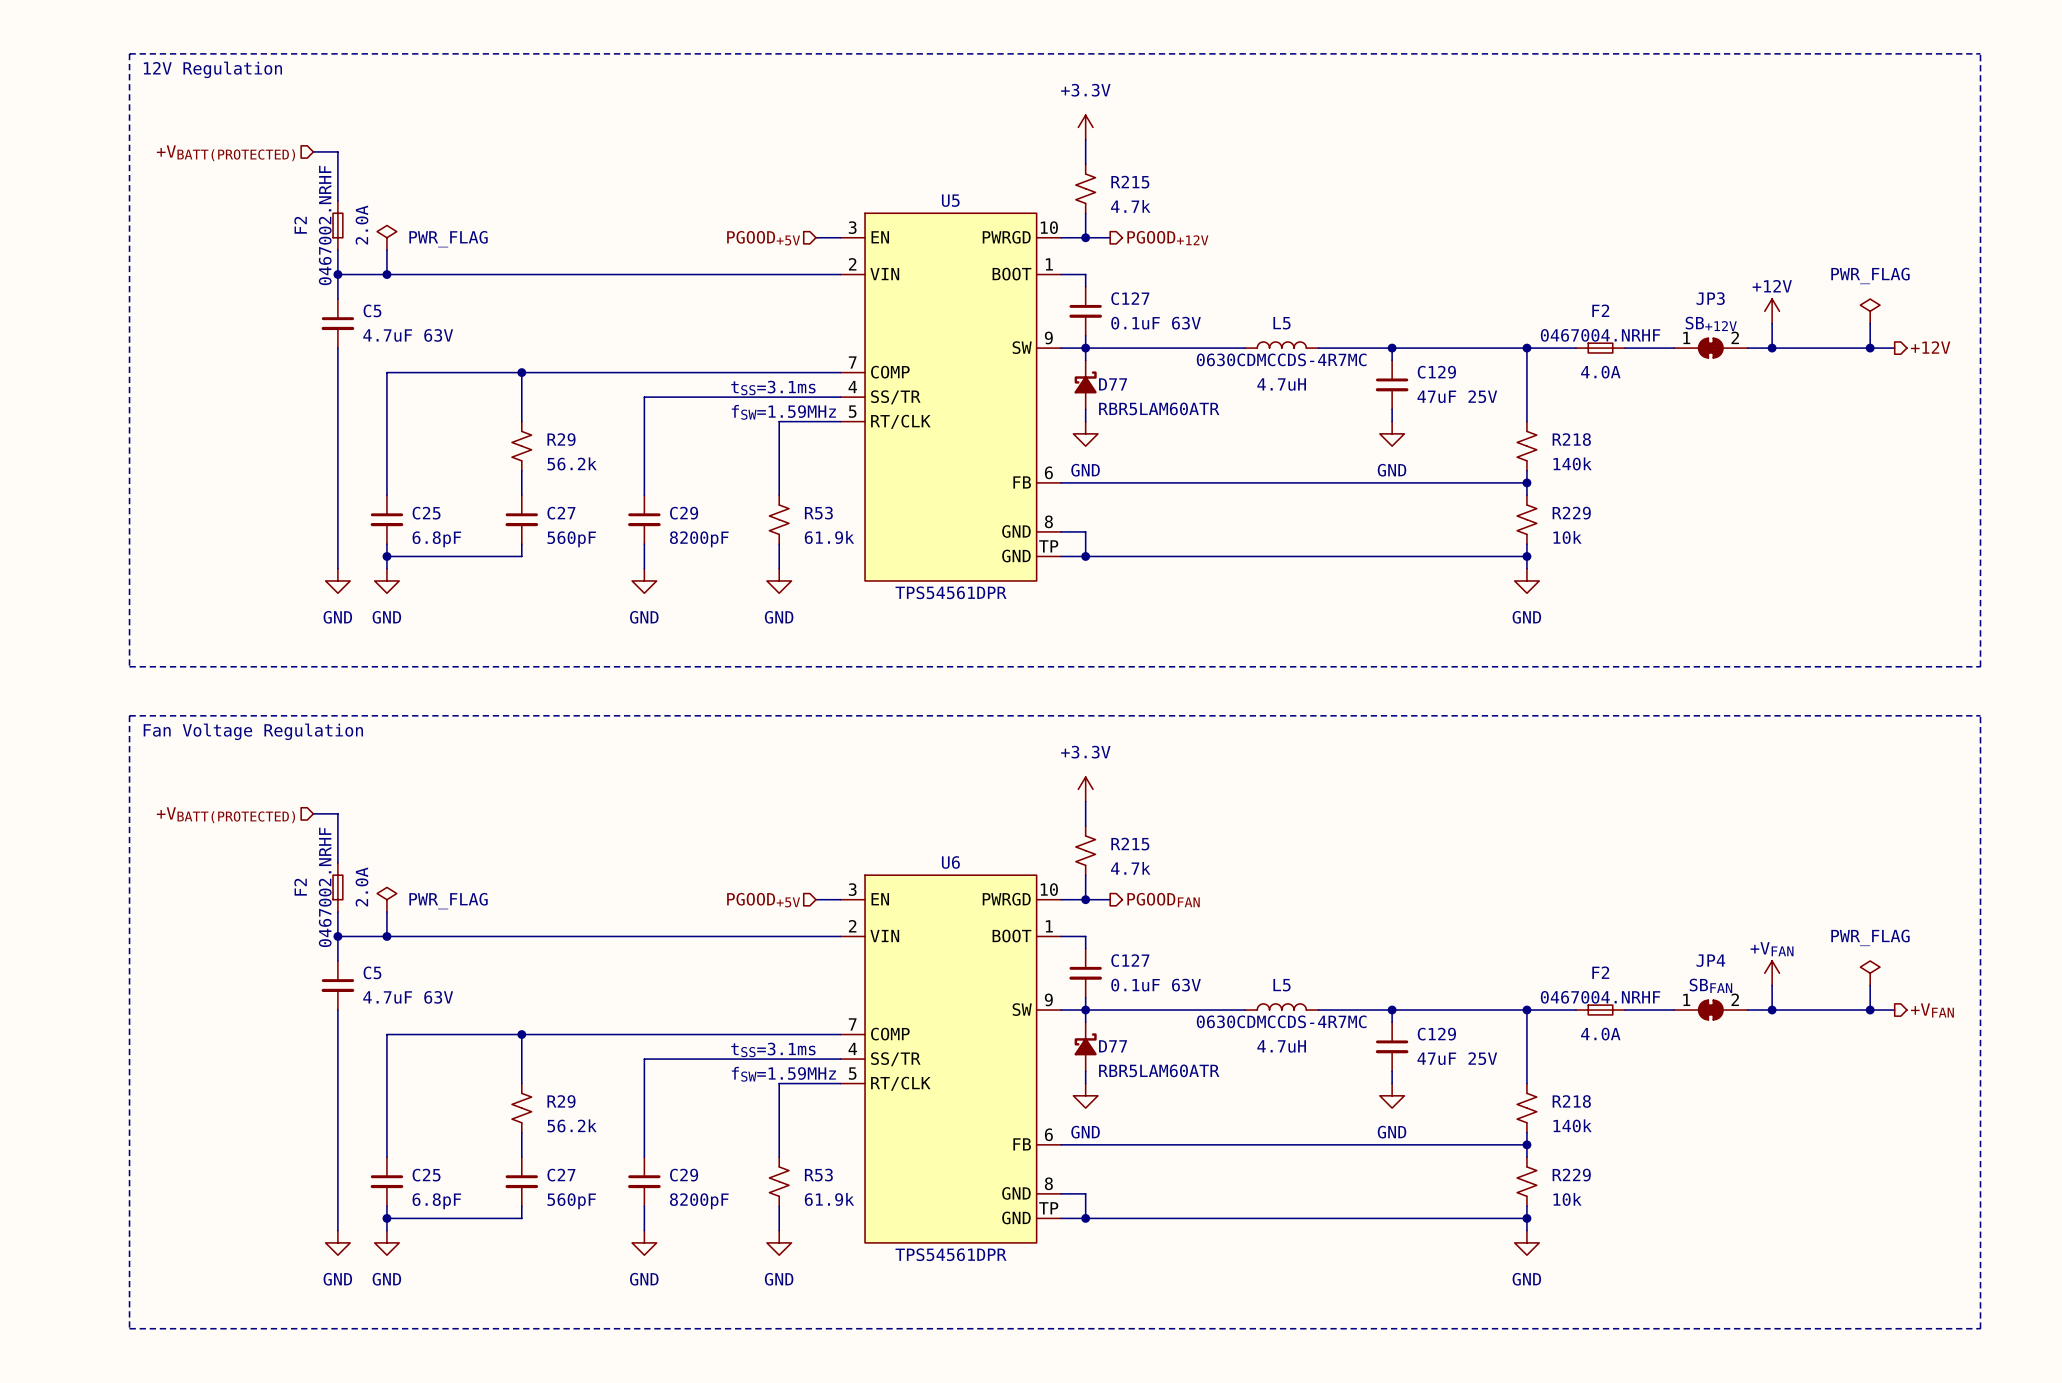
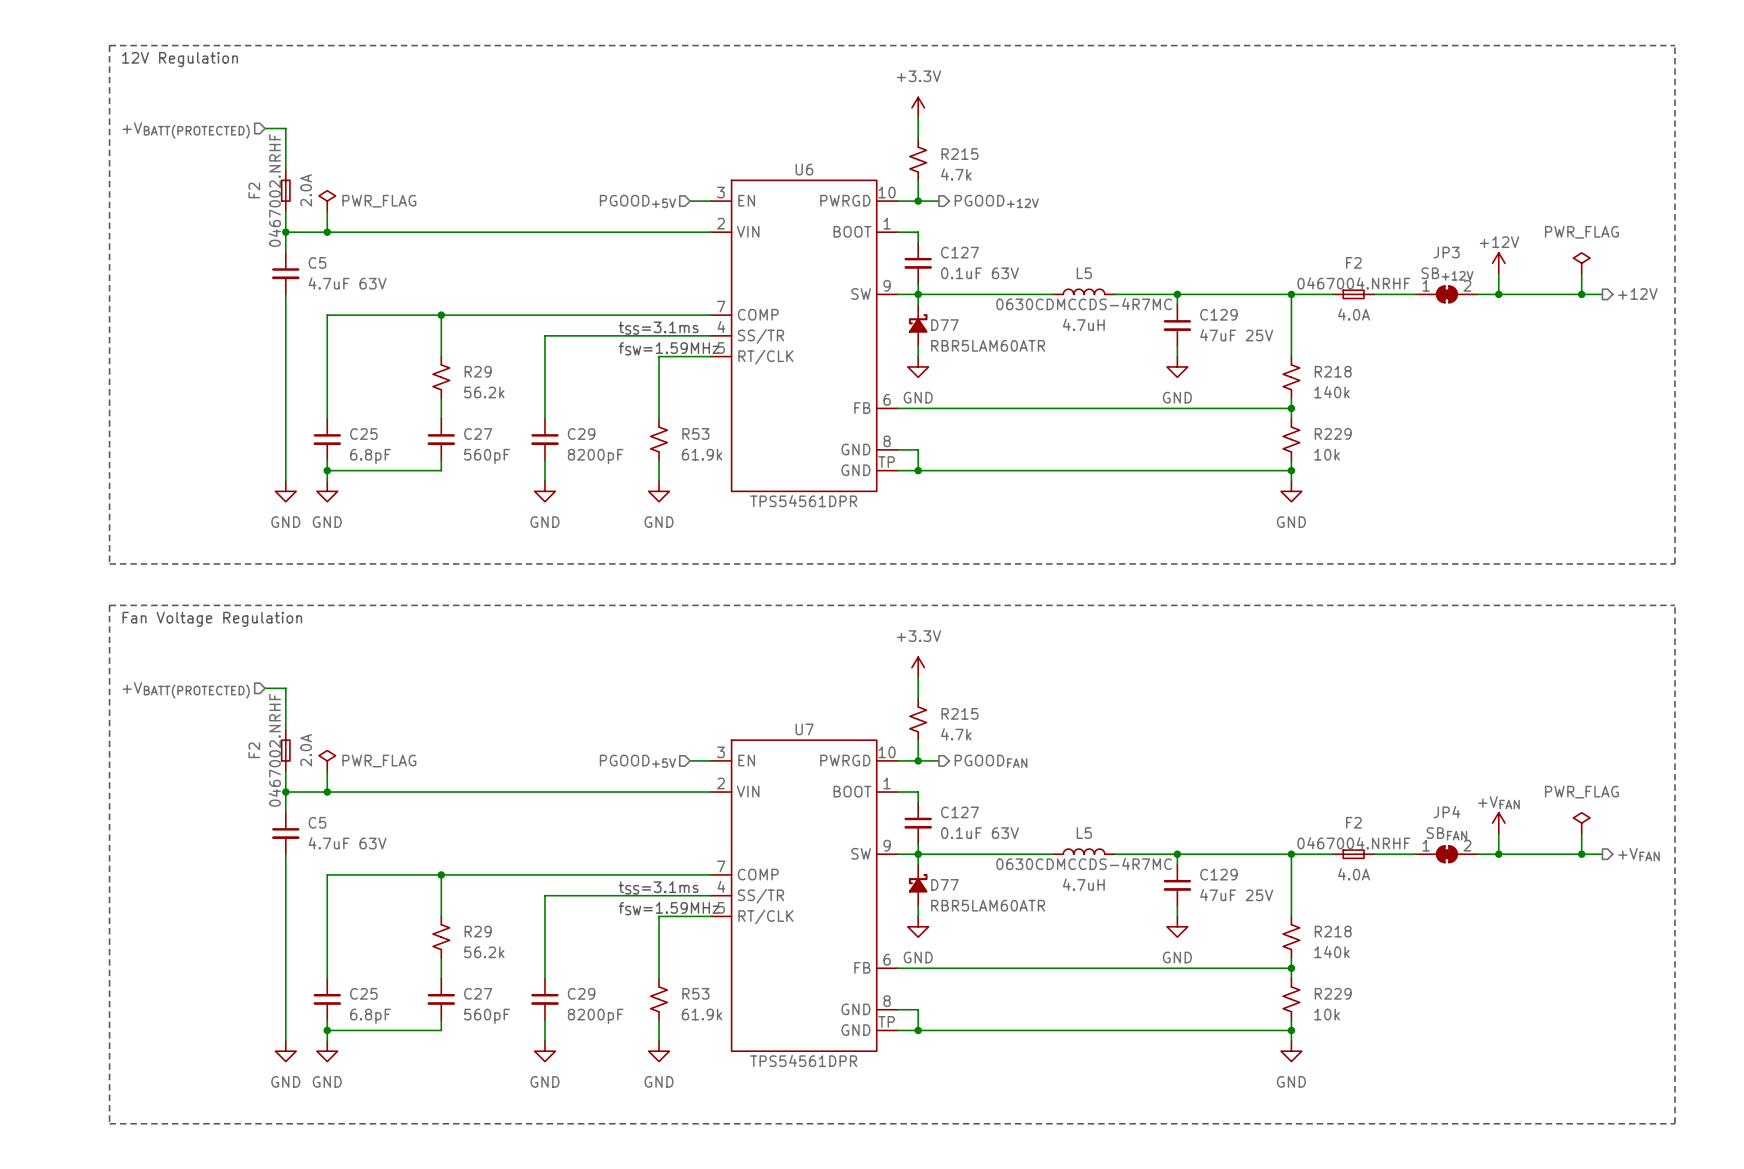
U5 name: U5 (950, 200) -> U6 (804, 169)
U6 name: U6 (950, 862) -> U7 (804, 729)

